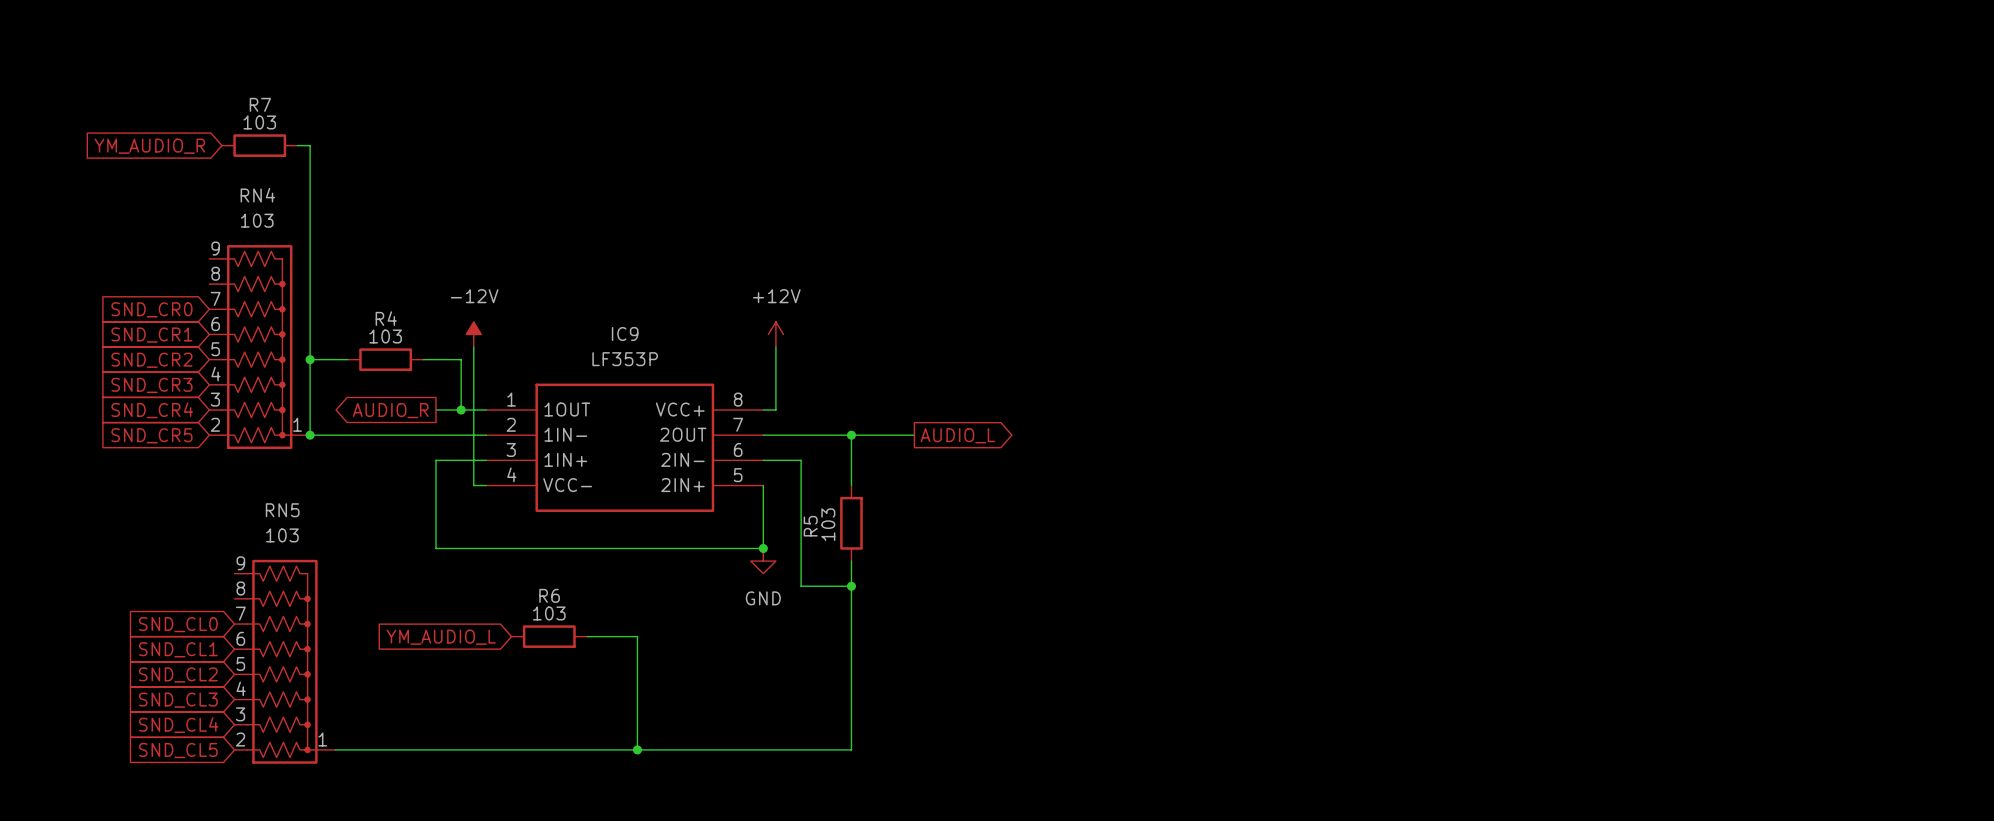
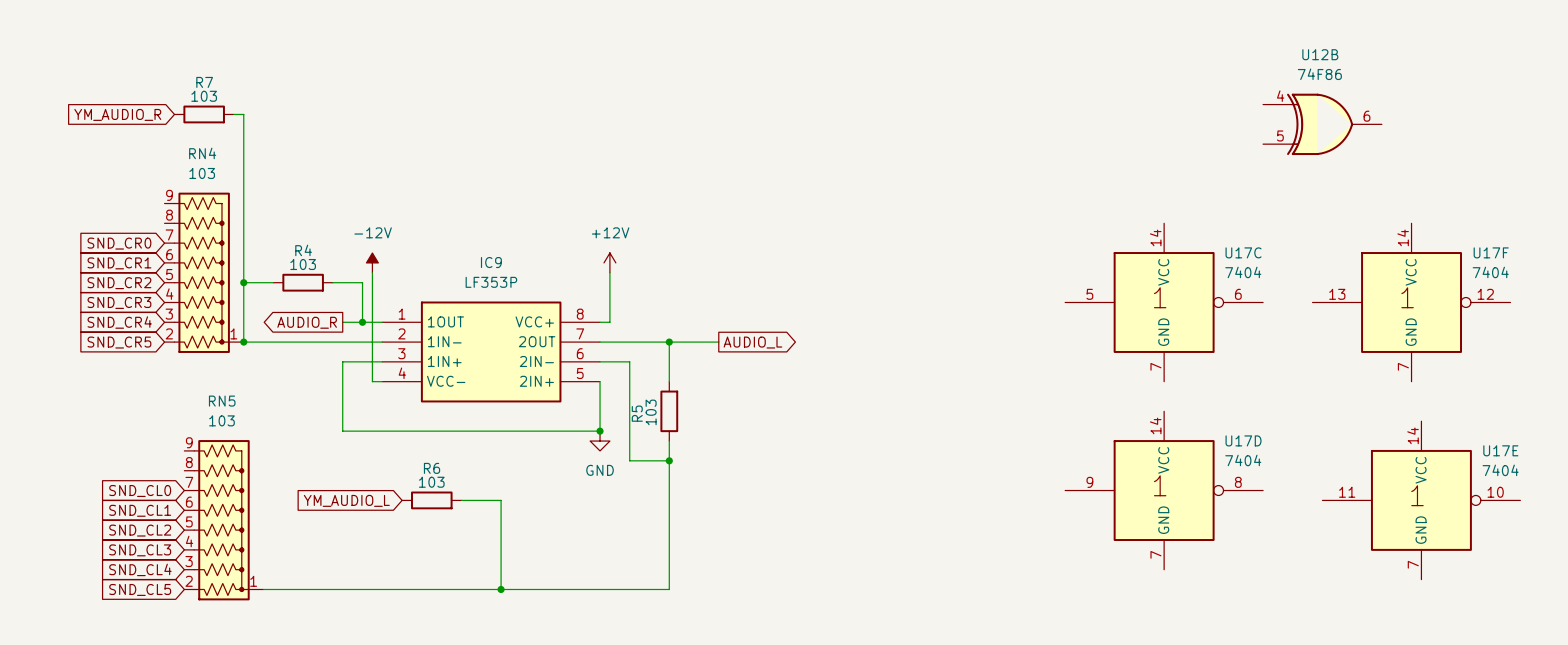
U12B: none -> 74F86 (1322, 124)
U17C: none -> 7404 (1164, 302)
U17F: none -> 7404 (1411, 302)
U17D: none -> 7404 (1164, 490)
U17E: none -> 7404 (1421, 500)

